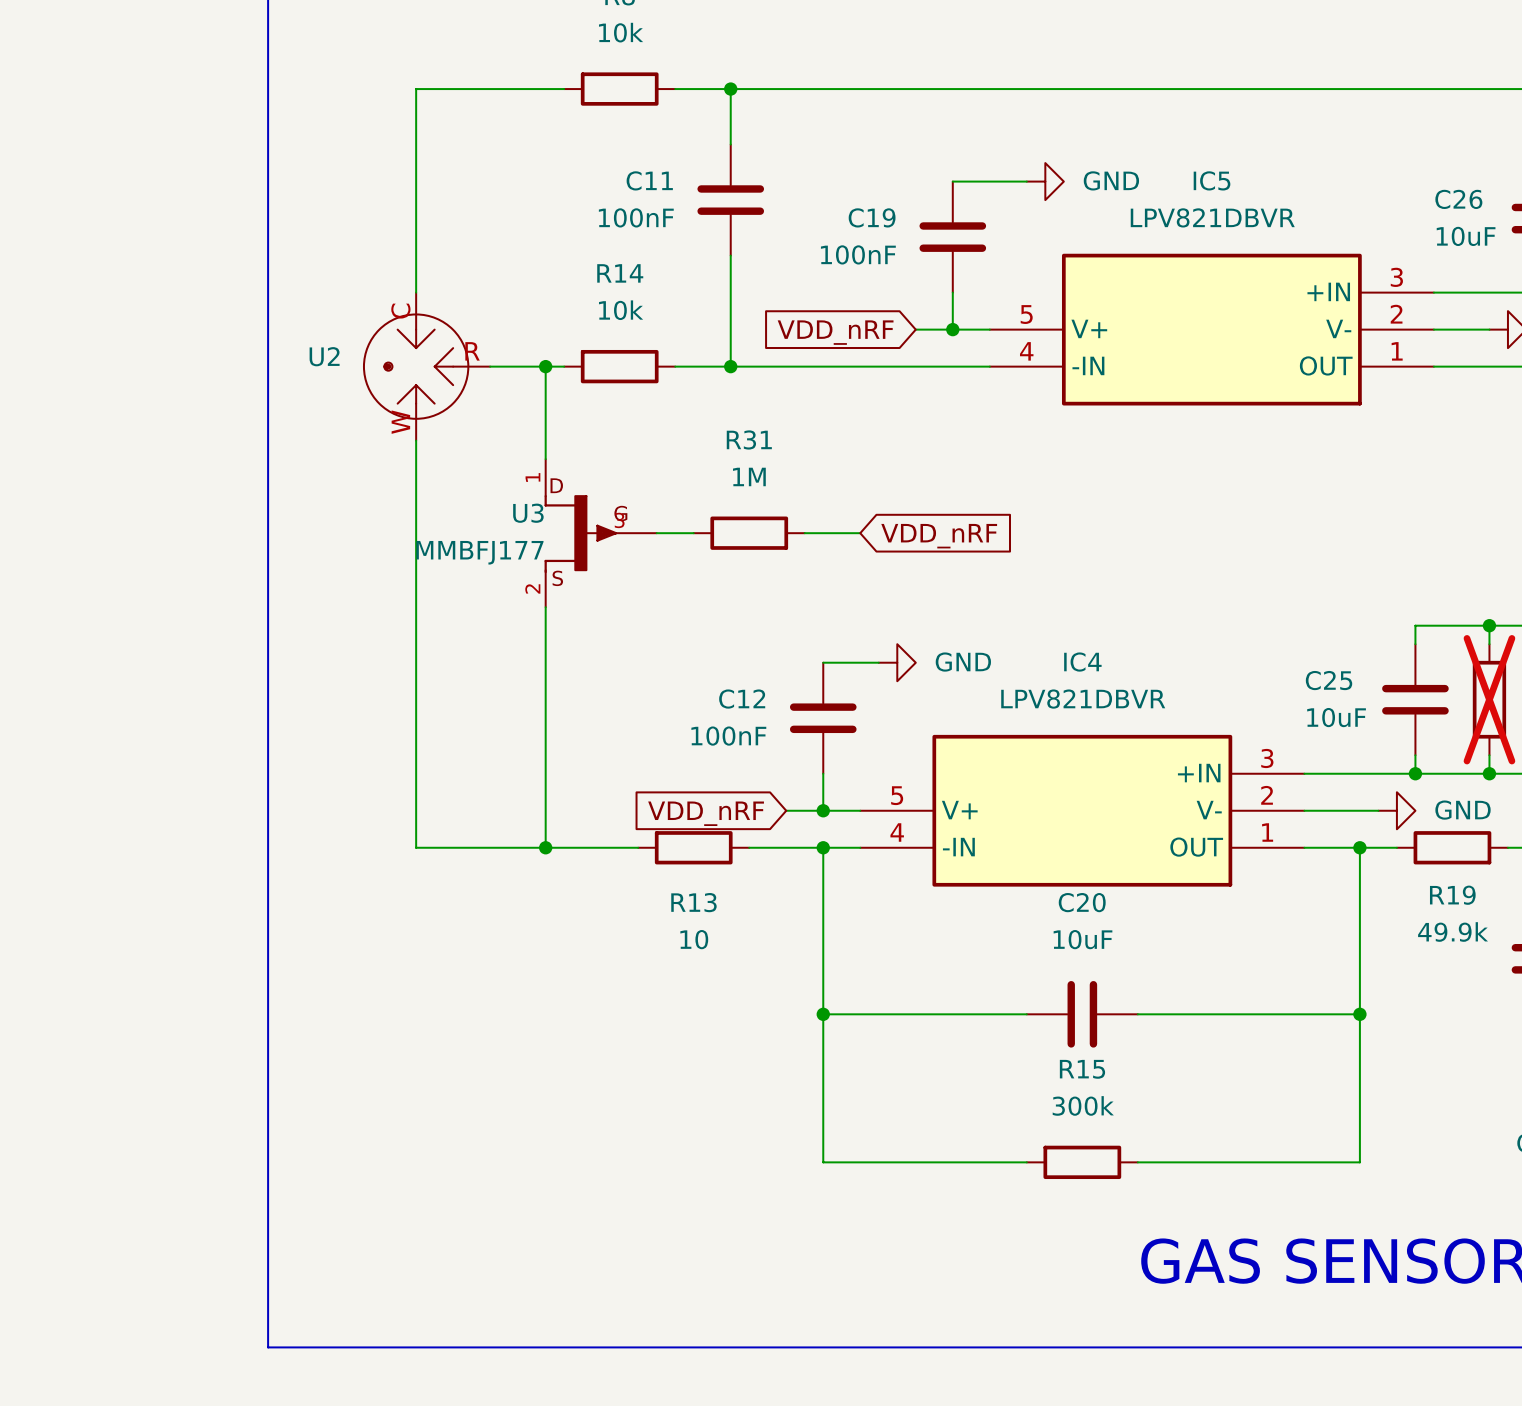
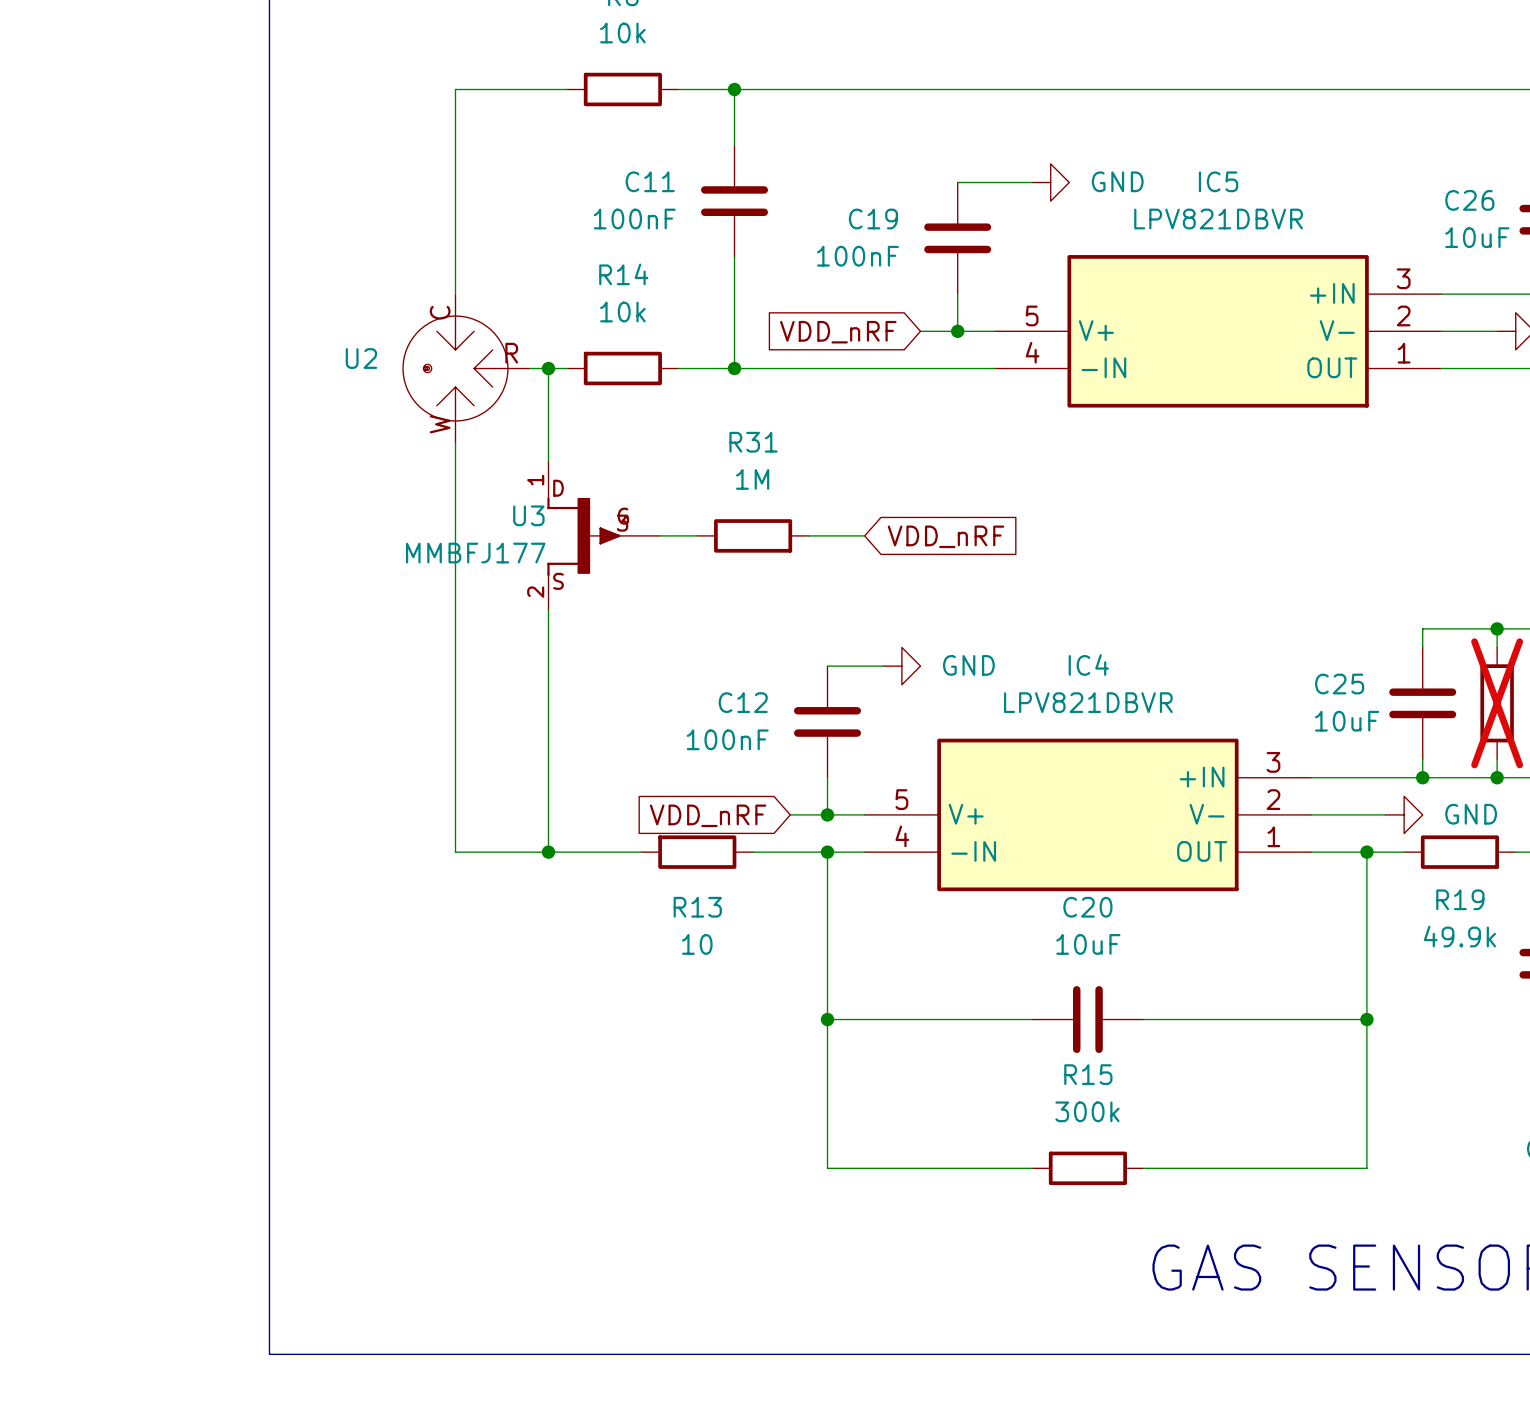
wire: (453, 89) (416, 89) (416, 292) -> (455, 89) (455, 294)
U2 position: (427, 366) -> (466, 368)
wire: (416, 440) (416, 847) (453, 847) -> (455, 442) (455, 852)

